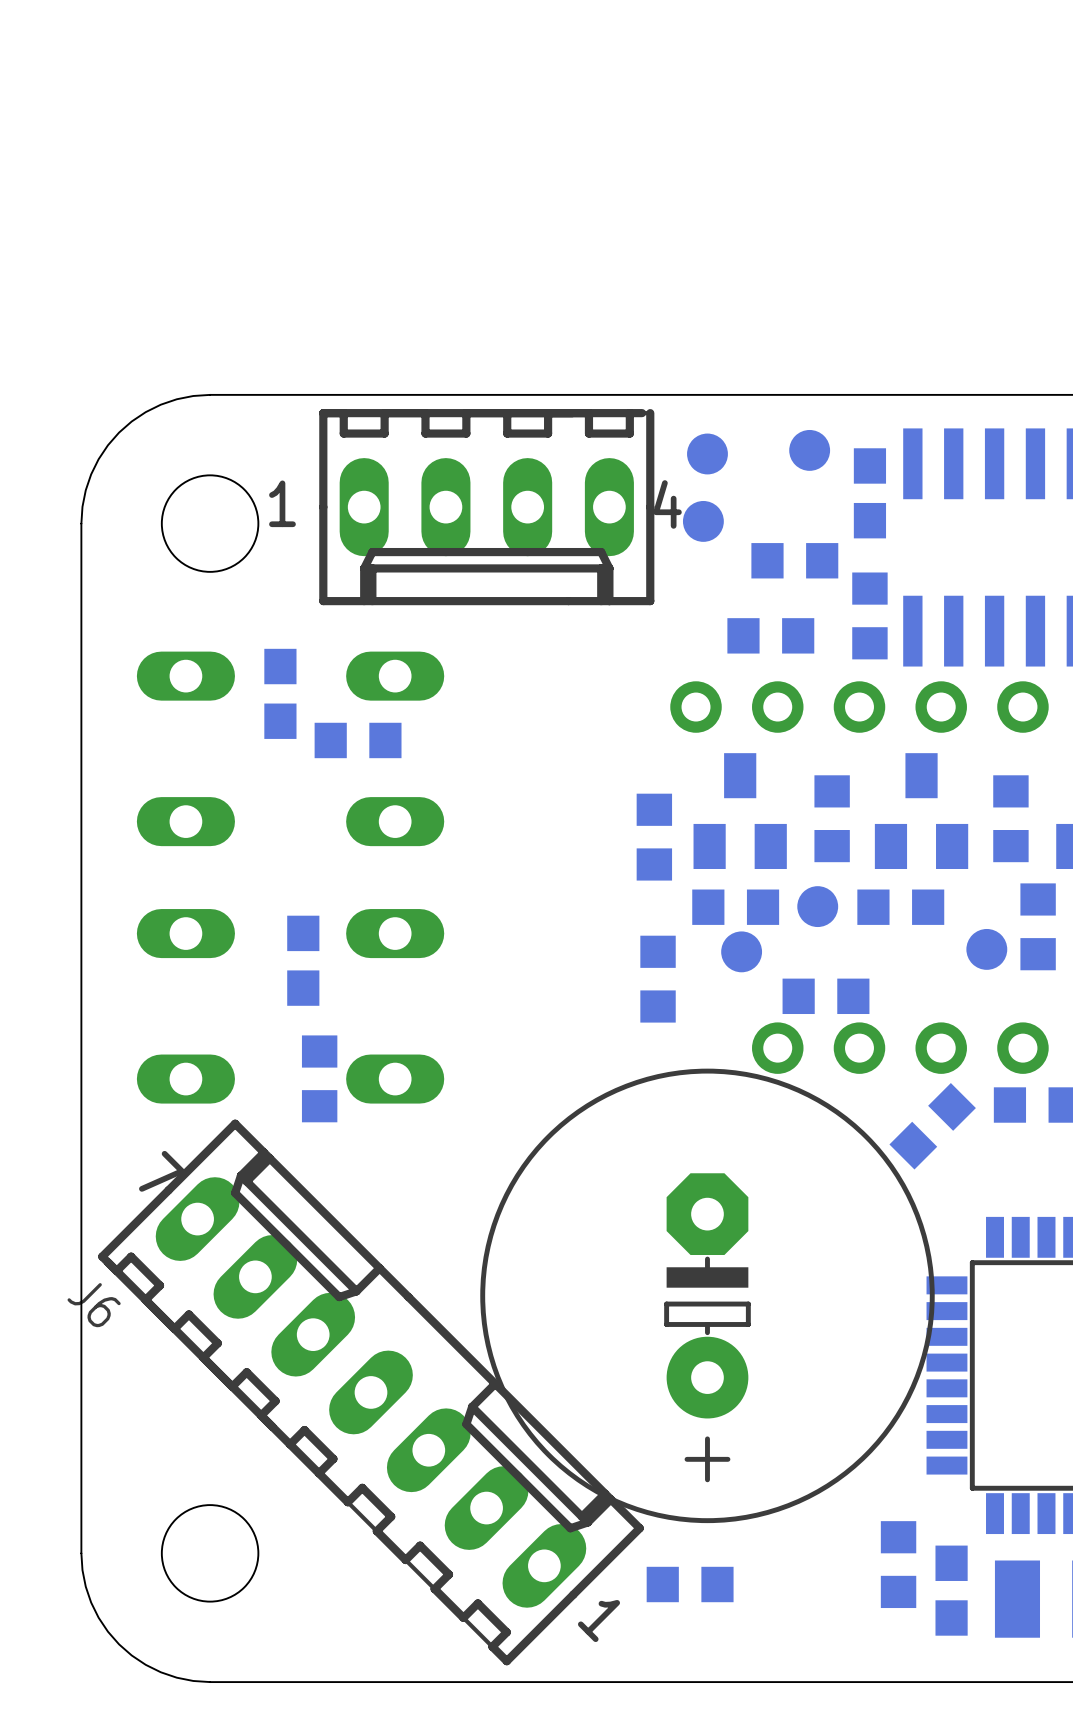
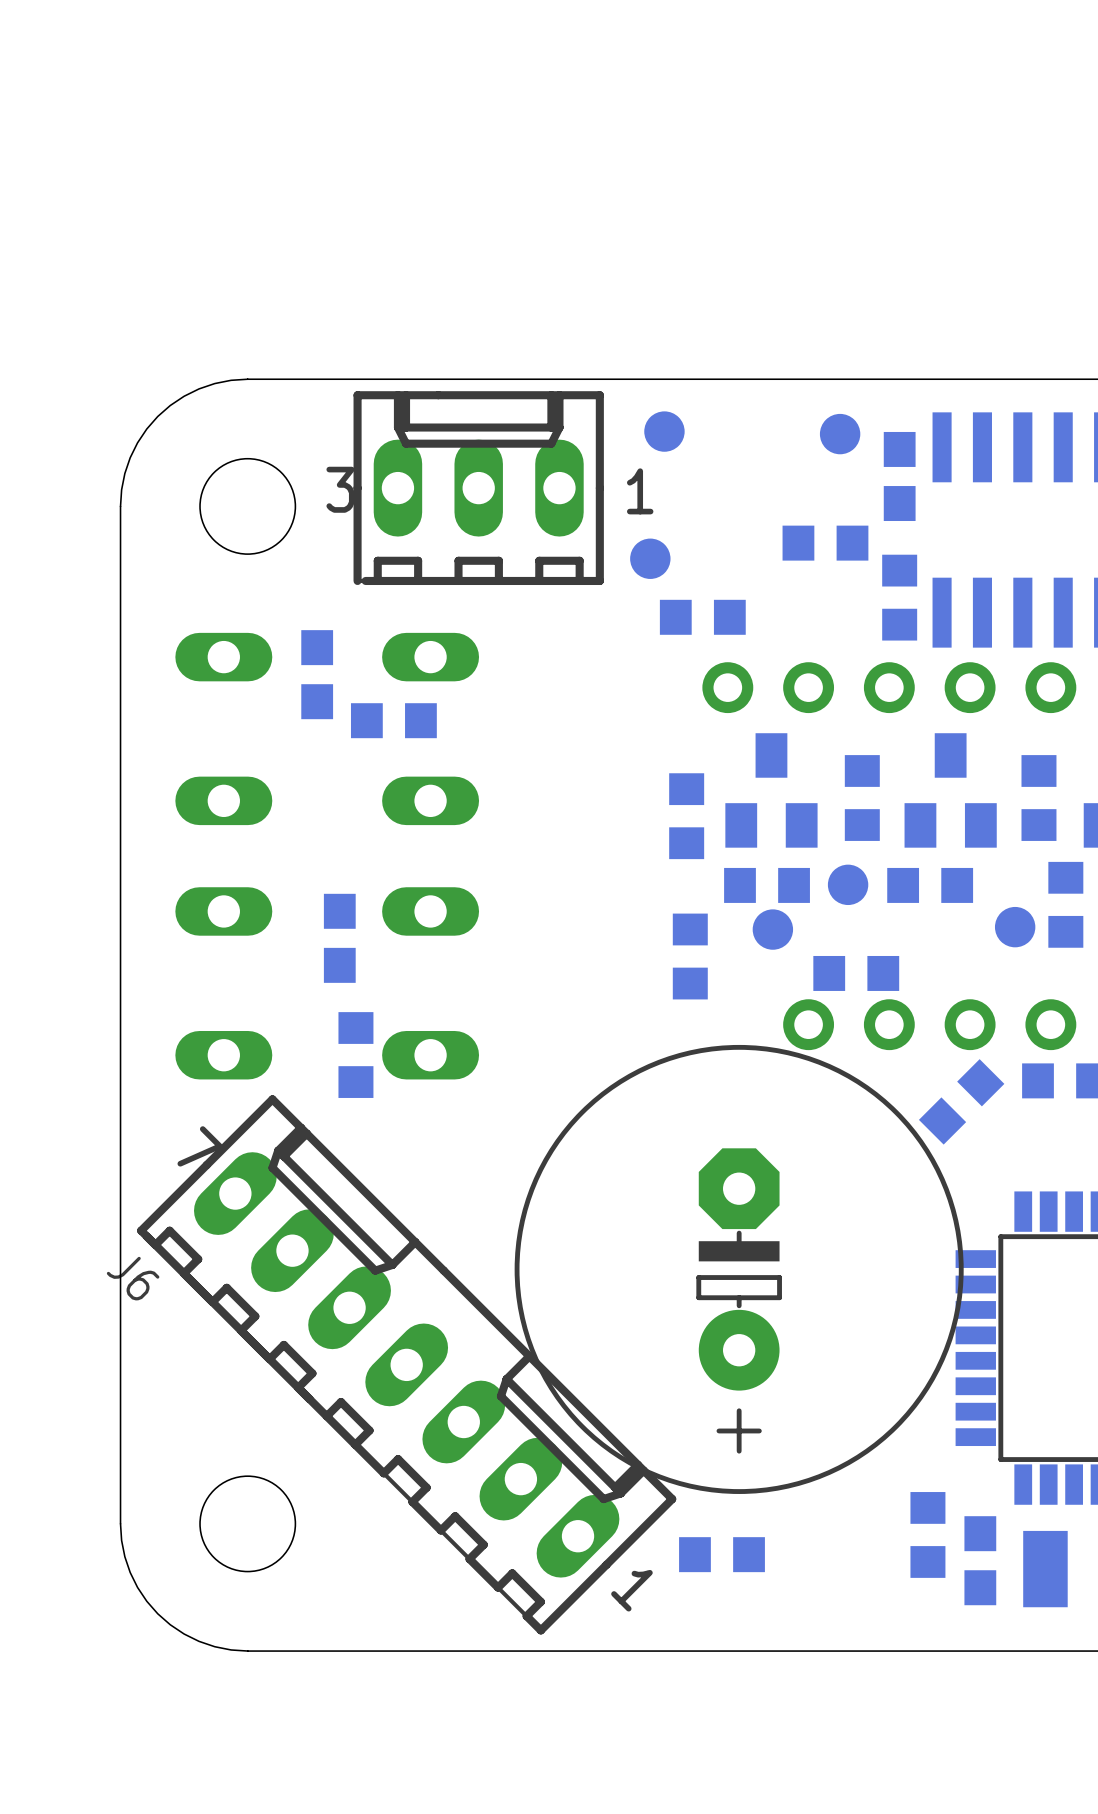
part: none -> (664, 431)
part: (707, 453) -> none
part: none -> (478, 488)
part: (486, 507) -> none
part: (703, 521) -> none
part: none -> (650, 558)
part position: (770, 635) -> (702, 617)

